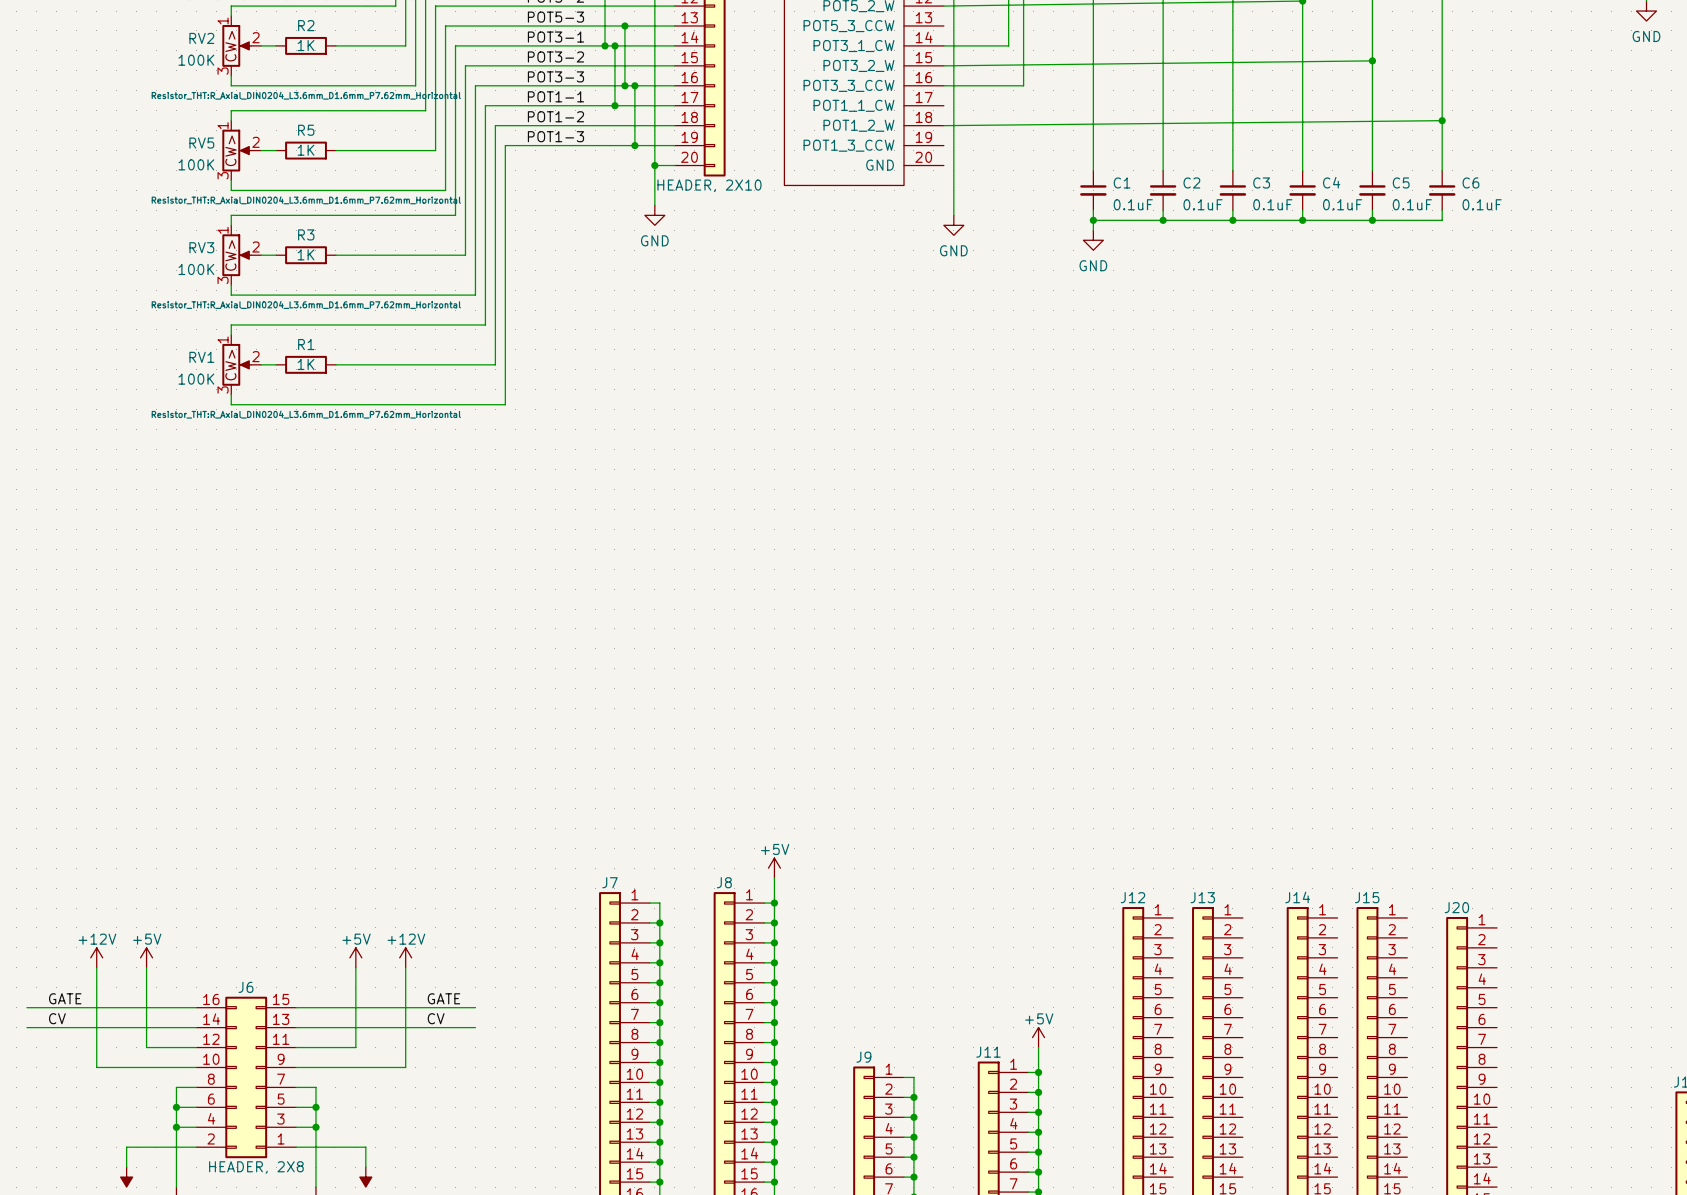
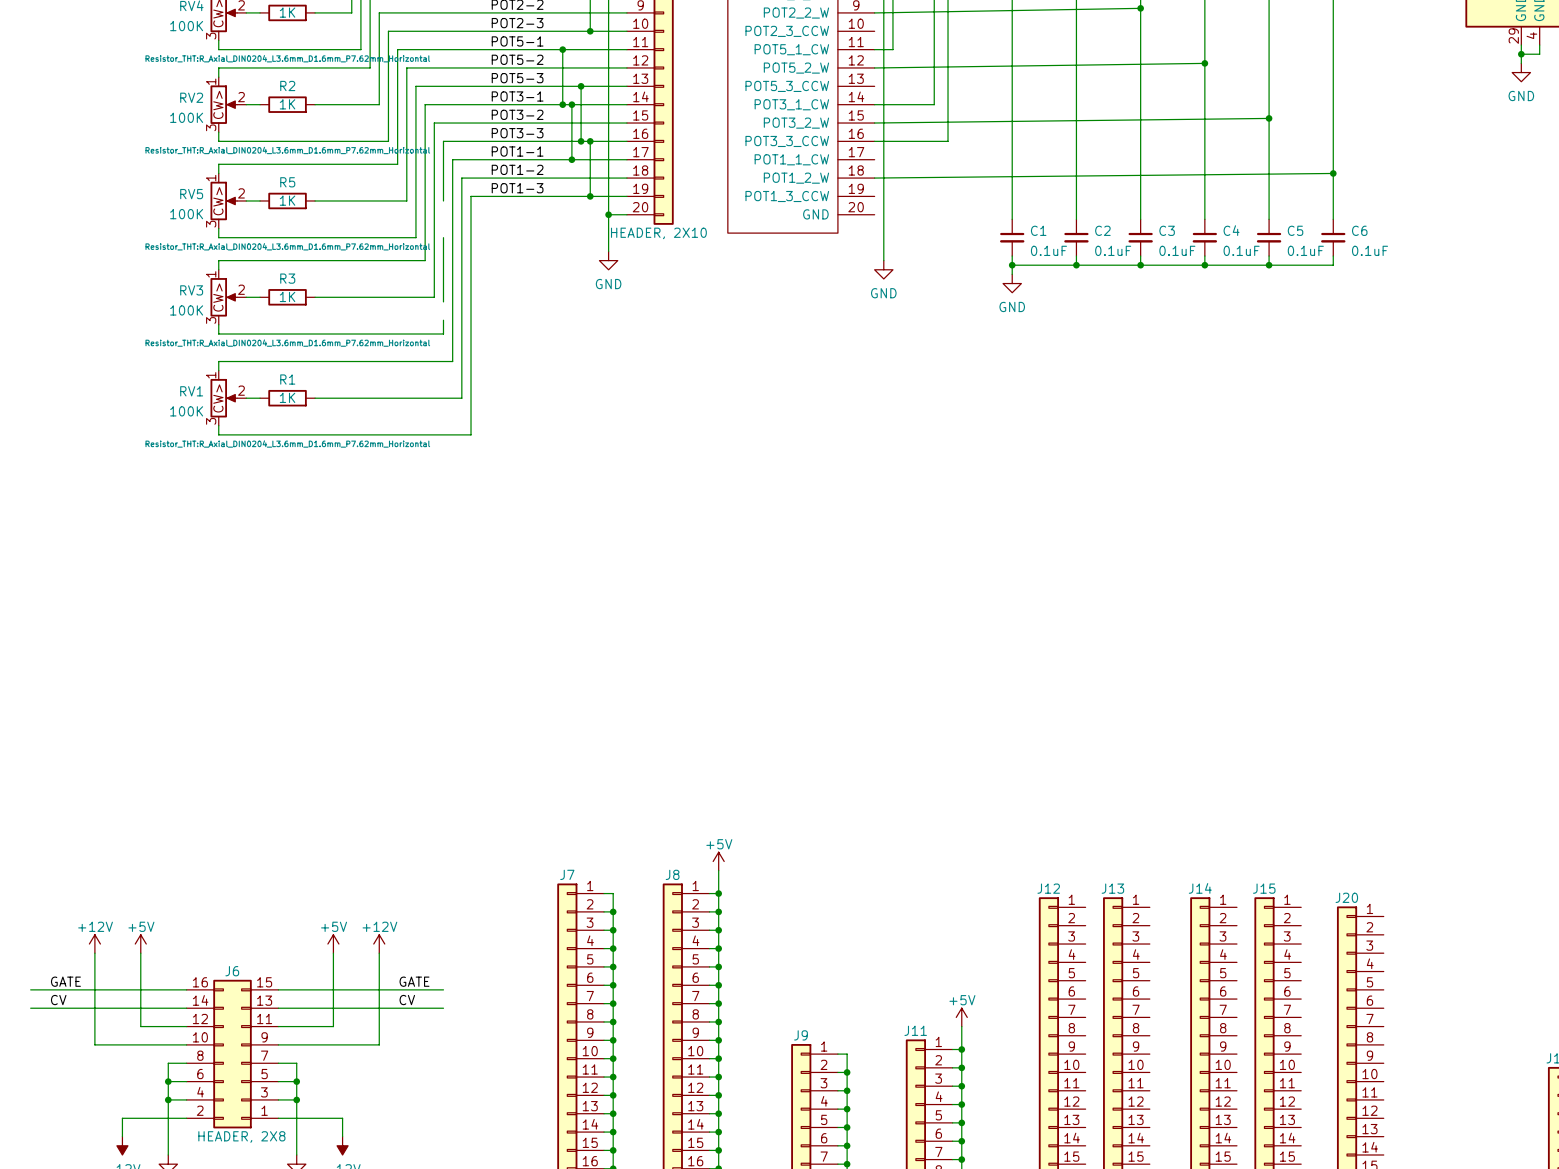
wire: (475, 150) (475, 190) -> none
wire: (475, 260) (475, 280) -> none

